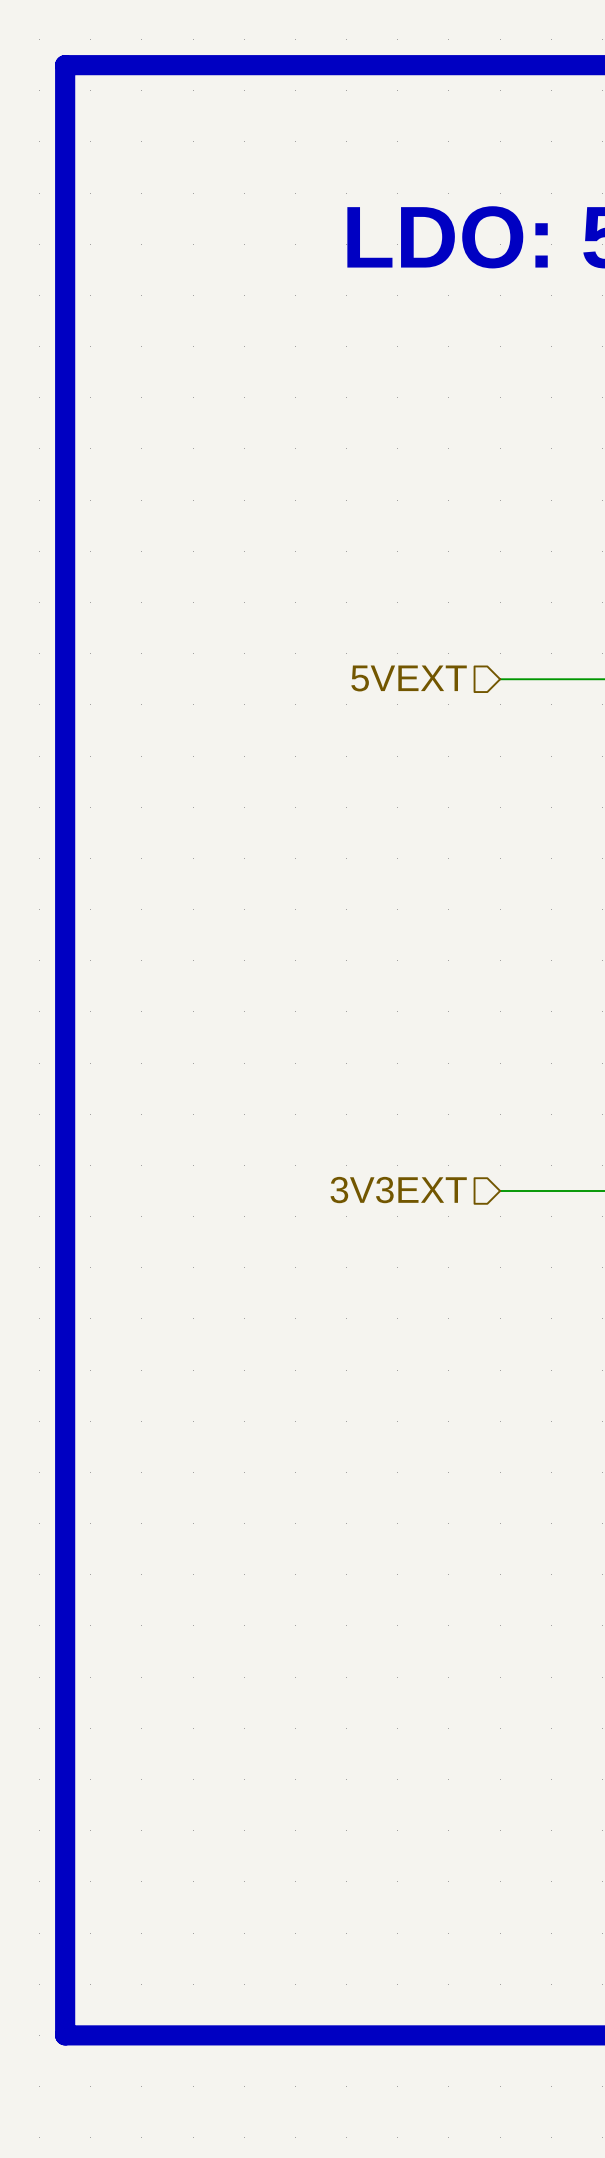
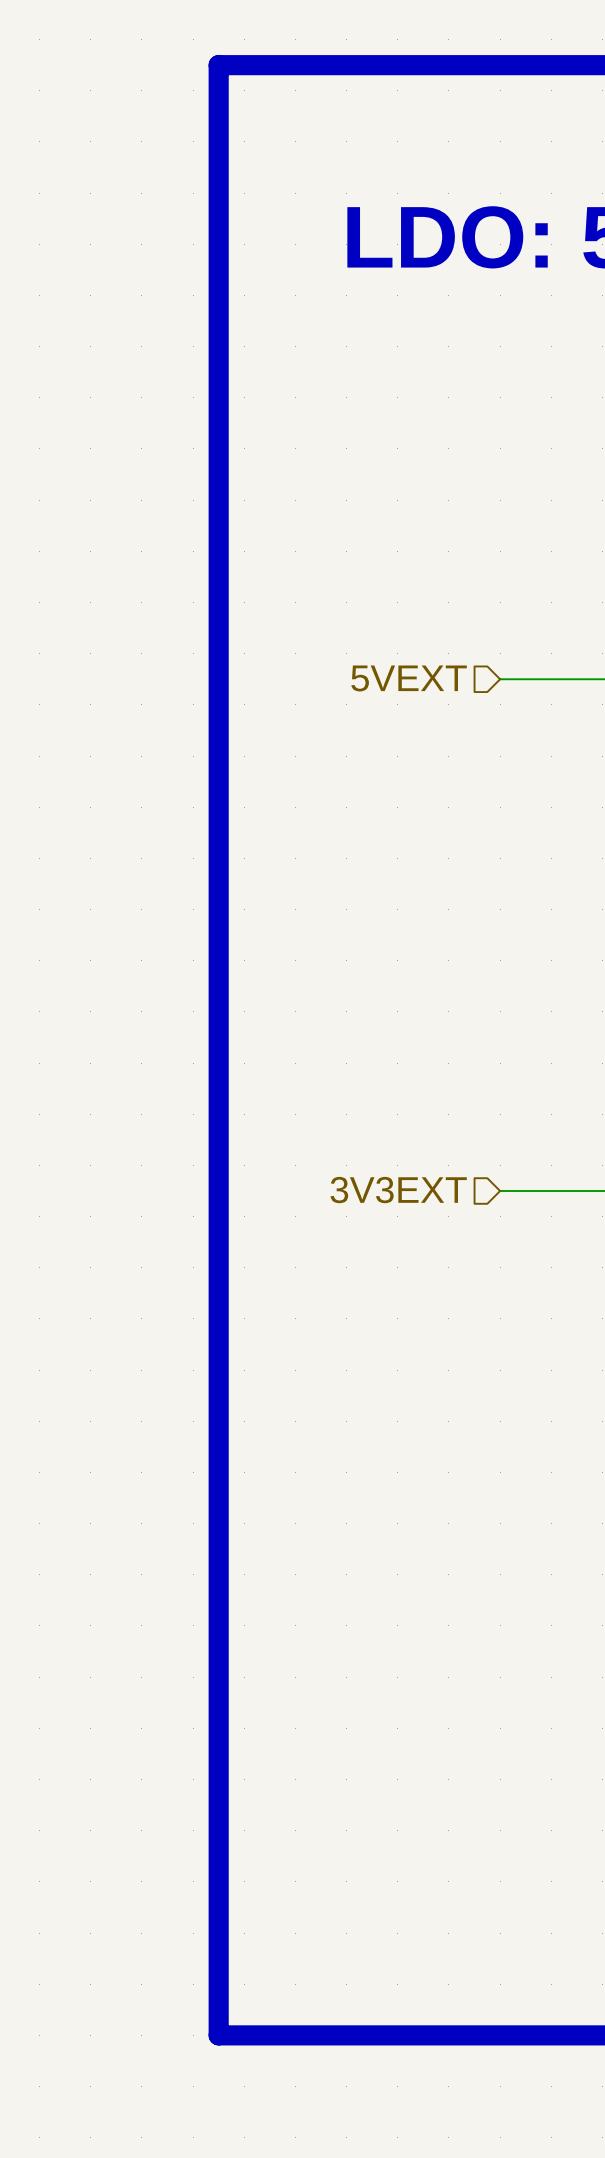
line: (218, 65) (65, 65) (65, 2035) (218, 2035) -> (218, 65) (218, 2035)

